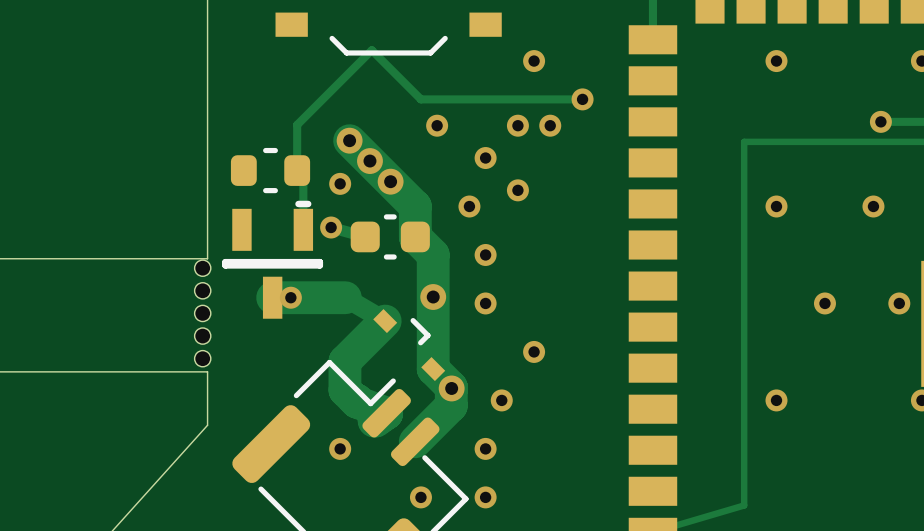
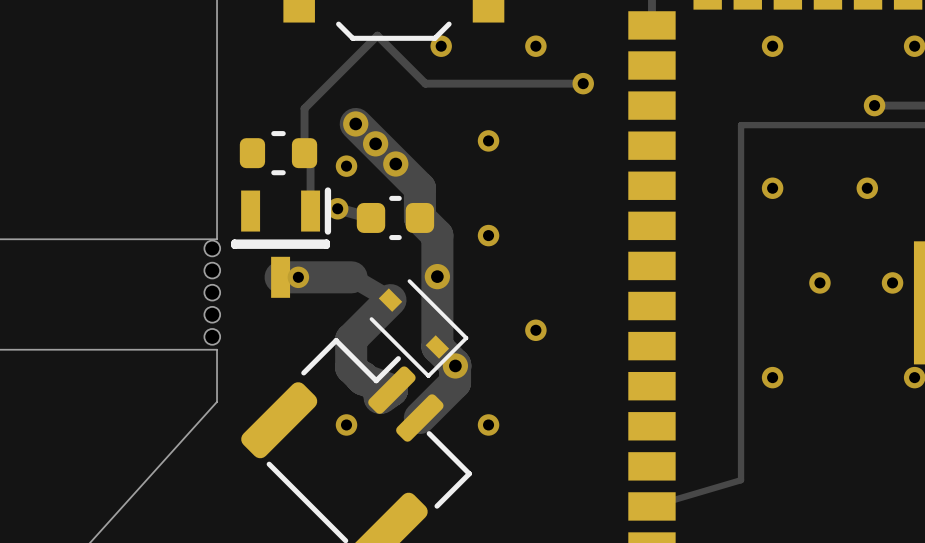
via: none -> (441, 46)
via: (437, 125) -> none
via: (517, 125) -> none
via: (550, 125) -> none
via: (517, 190) -> none
part footprint: [222, 200, 324, 319] -> [231, 187, 332, 298]
via: (469, 206) -> none
via: (485, 303) -> none
part footprint: [373, 309, 446, 382] -> [369, 279, 469, 378]
via: (501, 400) -> none
via: (420, 497) -> none
via: (485, 497) -> none

